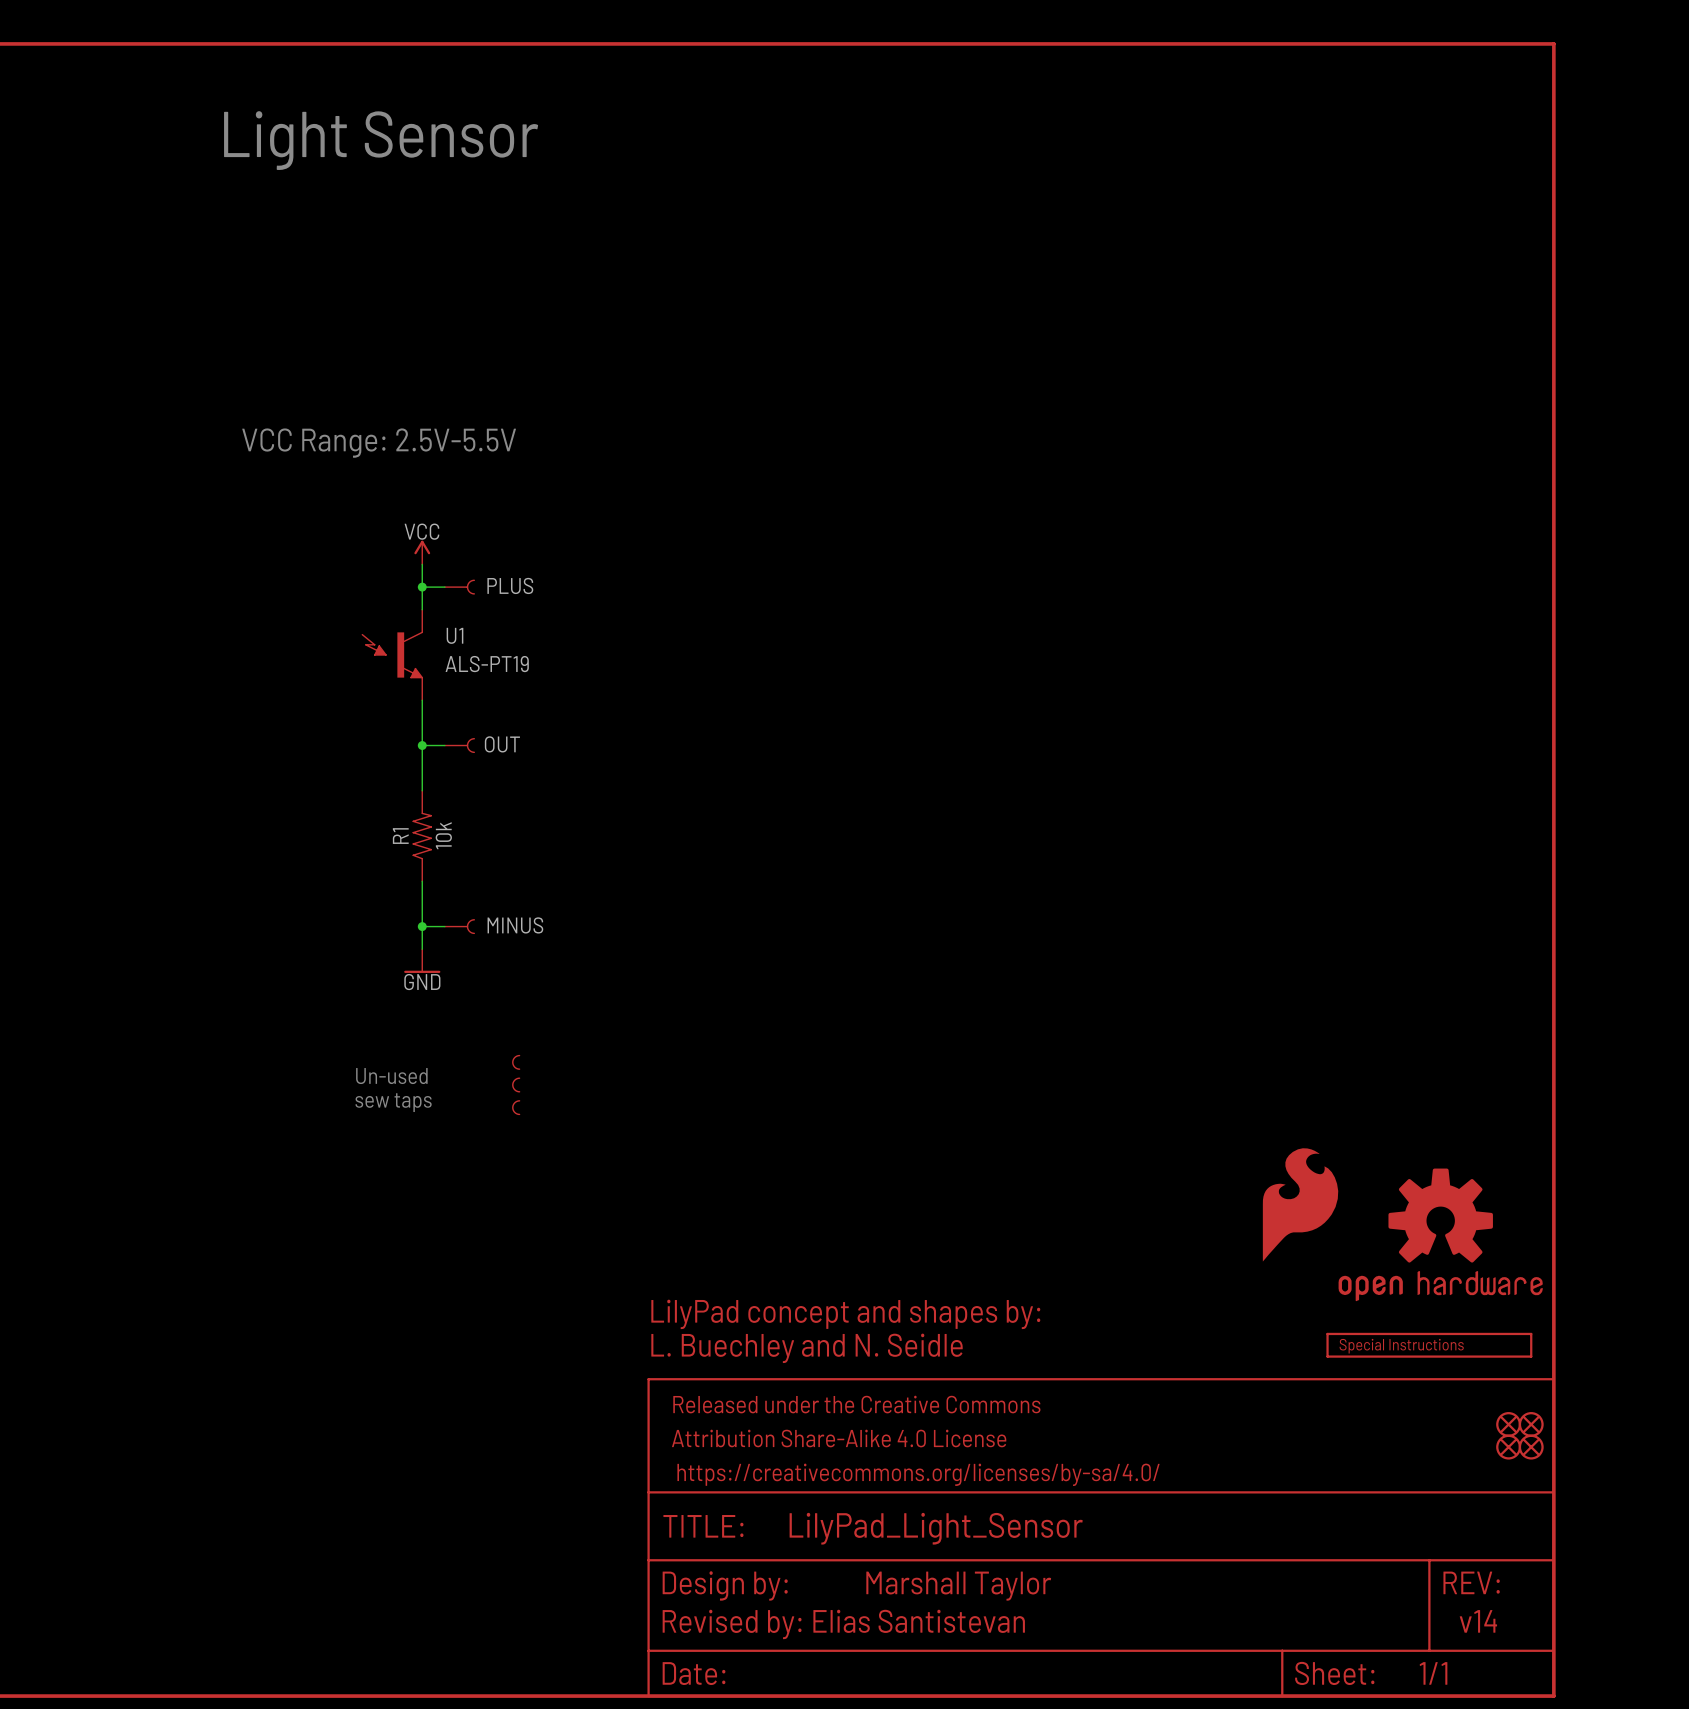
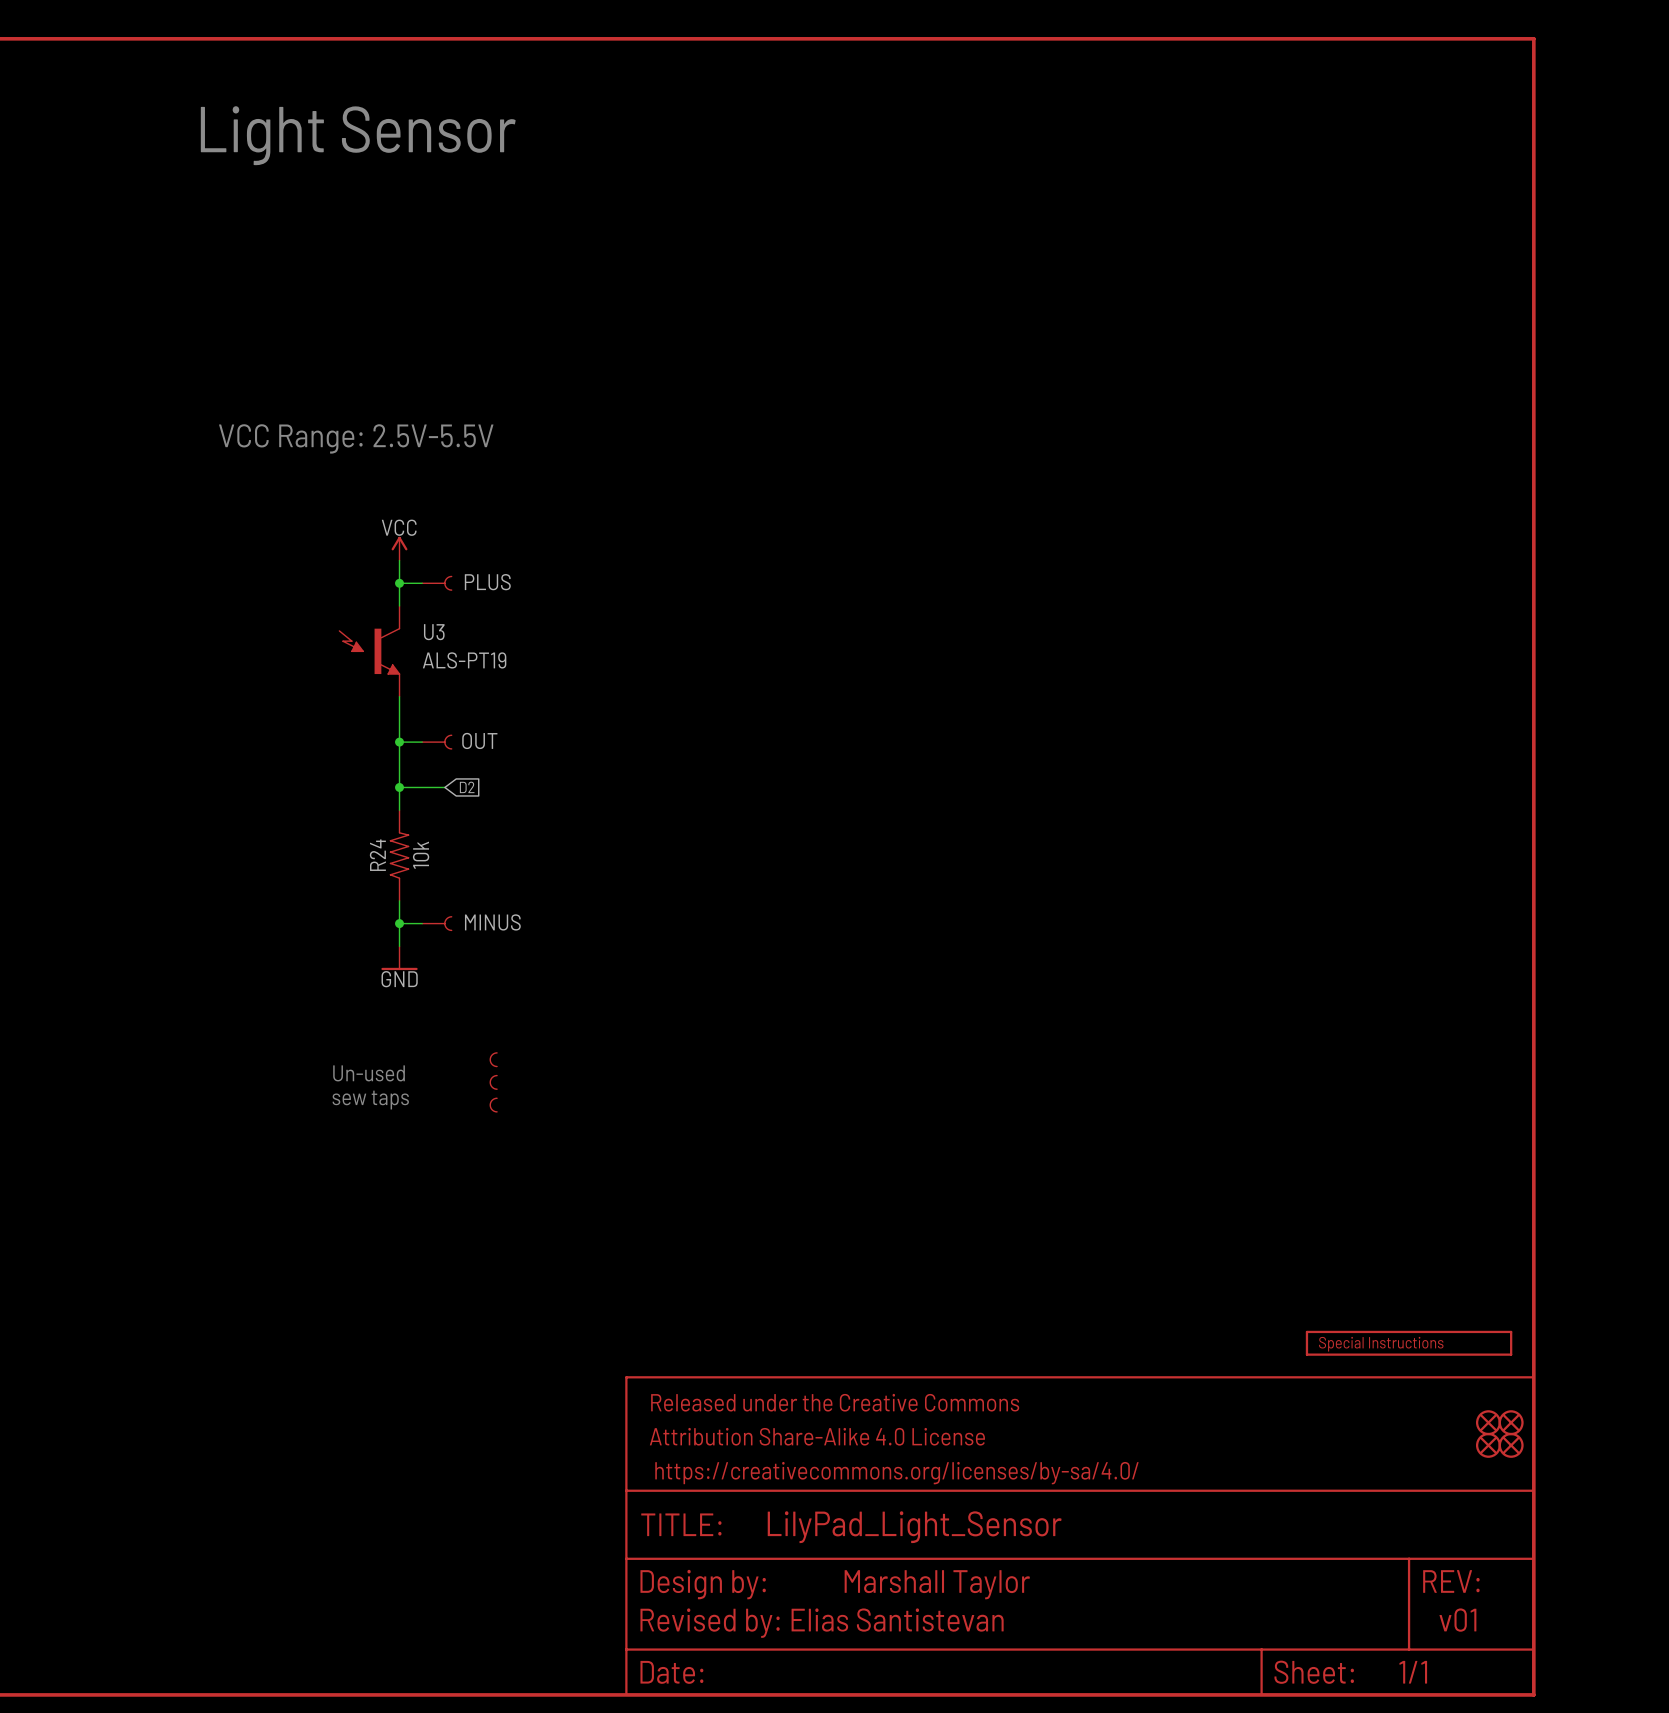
U1 name: U1 (454, 635) -> U3 (434, 632)
junction: none -> (399, 787)
wire: none -> (444, 787) (399, 787) (399, 810)
global label: none -> D2 (467, 787)
R1: 10k (422, 836) -> none
R24: none -> 10k (399, 855)
part: (1300, 1204) -> none
part: (1440, 1234) -> none
text: LilyPad concept and shapes by: (845, 1314) -> none
text: L. Buechley and N. Seidle (807, 1348) -> none
text: v14 (1478, 1621) -> v01 (1457, 1620)

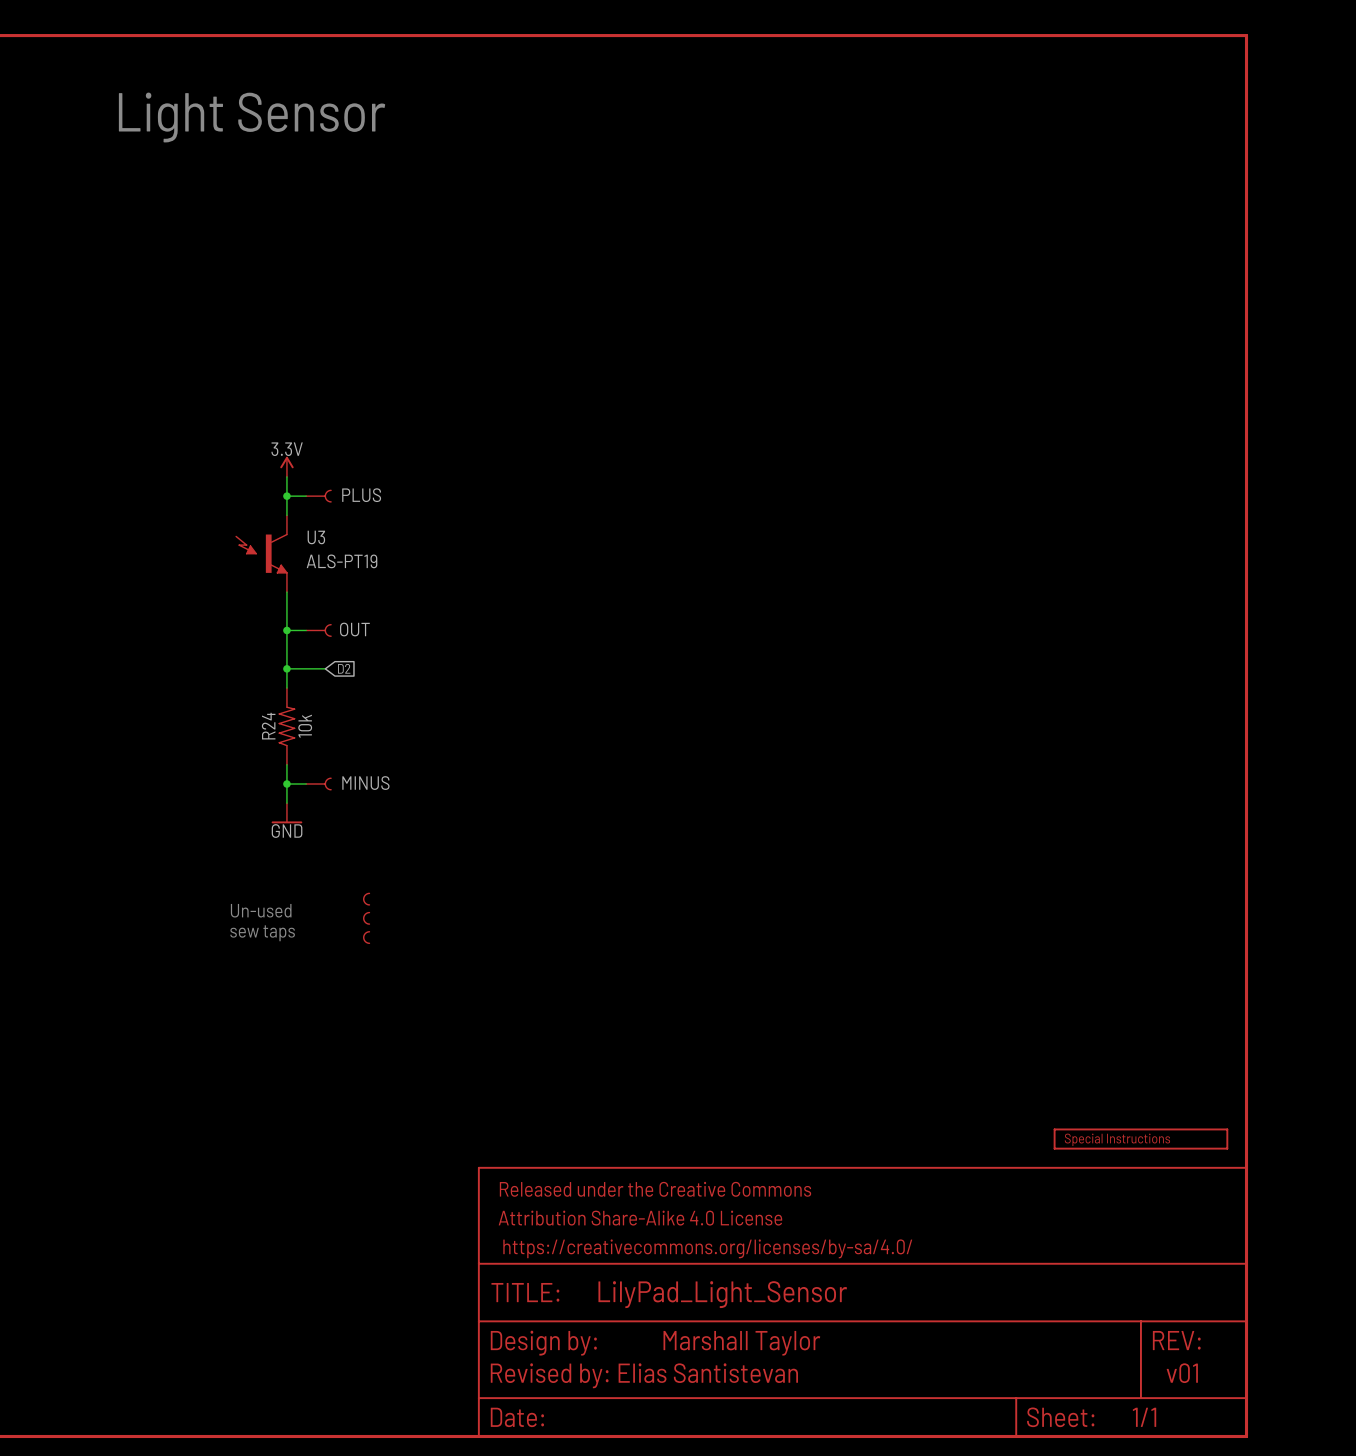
text: VCC Range: 2.5V-5.5V (356, 438) -> none
power symbol: VCC (399, 548) -> 3.3V (286, 466)
part: (1488, 1422) -> none
part: (1511, 1422) -> none
part: (1488, 1445) -> none
part: (1511, 1445) -> none

